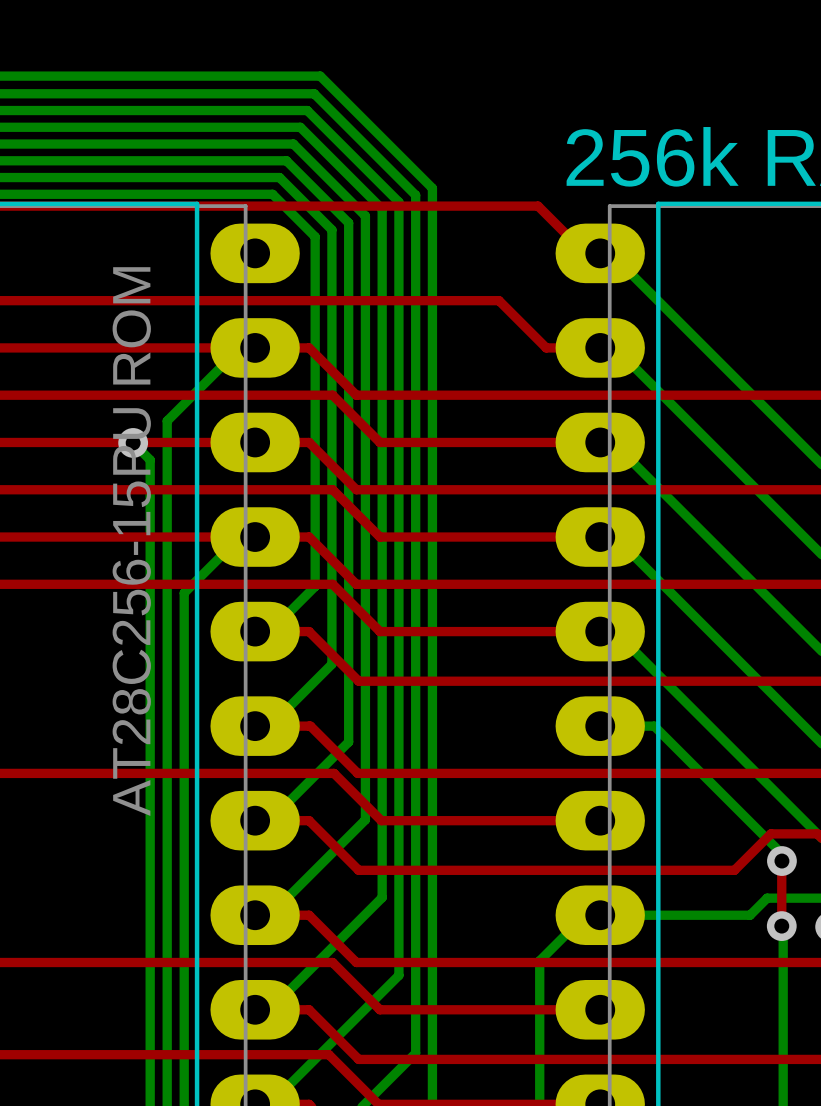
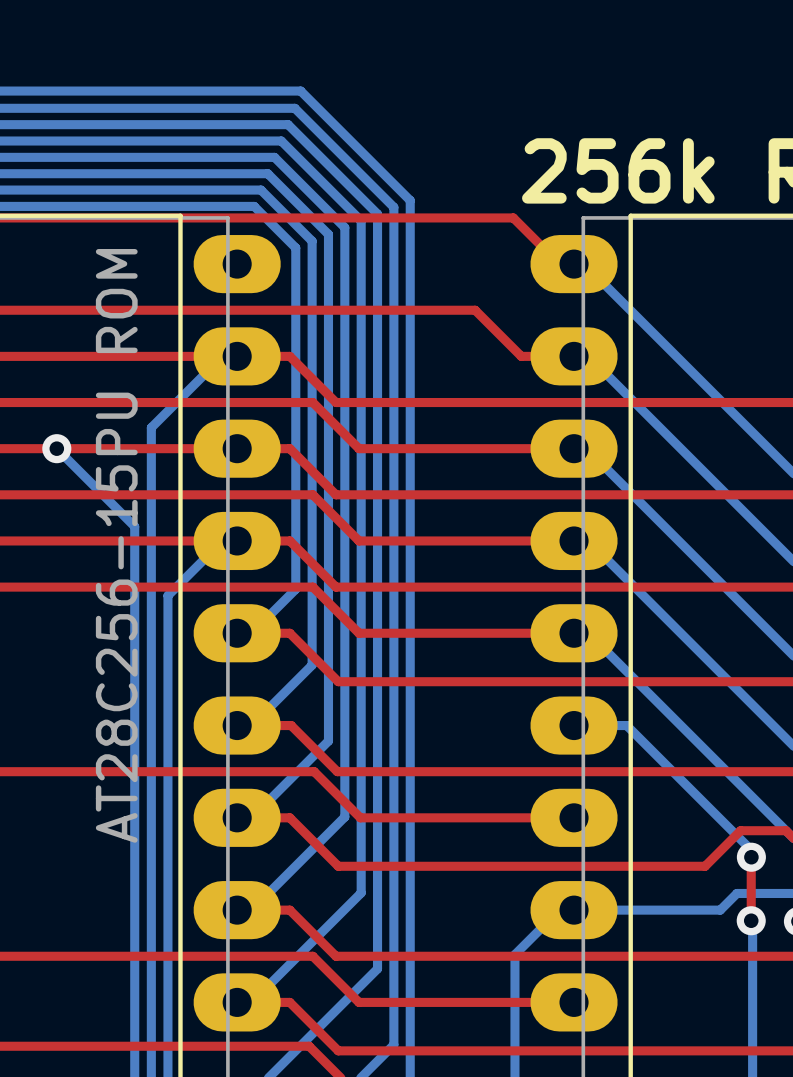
bottom track: (133, 442) (150, 459) (150, 522) -> (56, 448) (134, 526)
via position: (133, 442) -> (56, 448)

